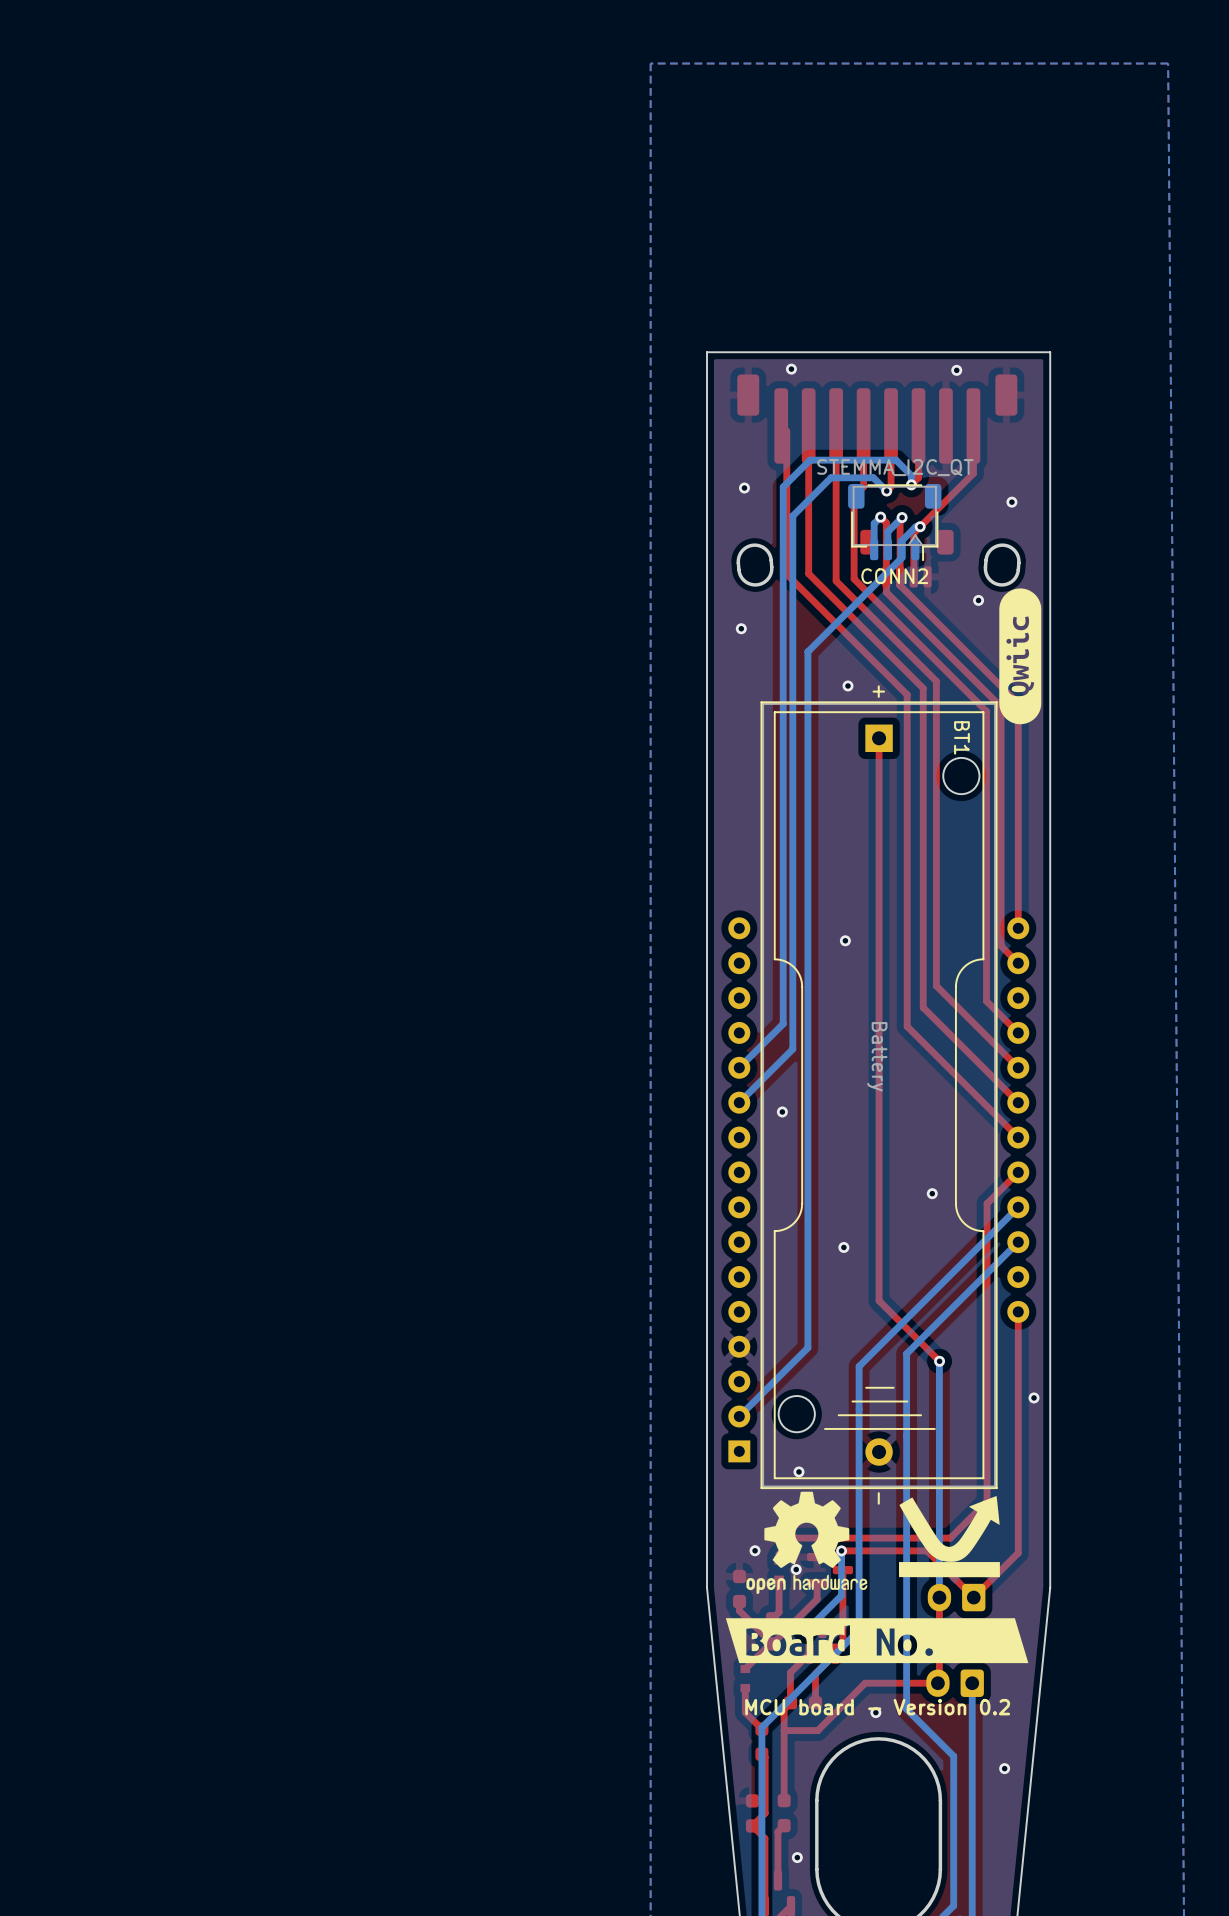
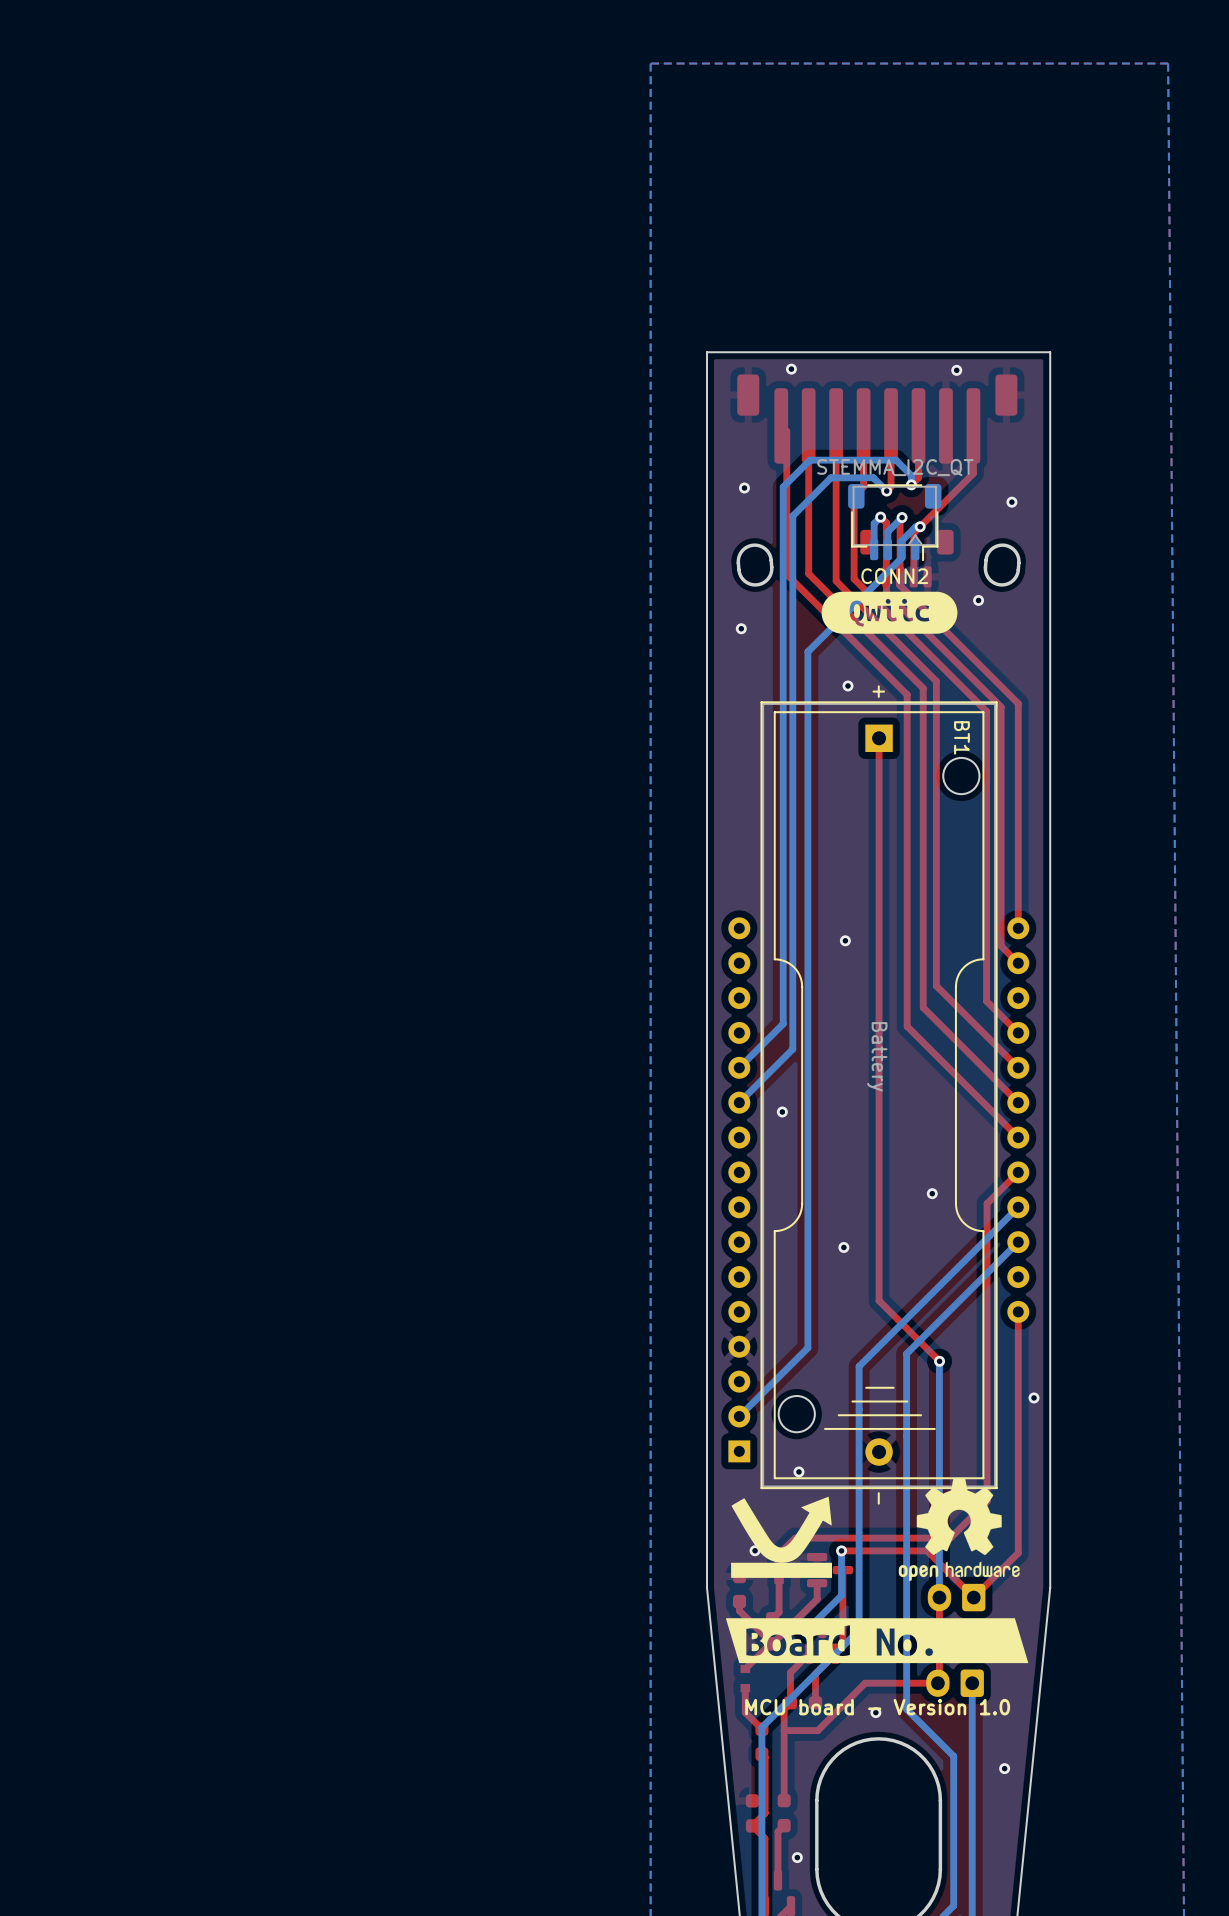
drawing: [999, 588, 1042, 725] -> none
drawing: none -> [821, 591, 958, 634]
drawing position: (949, 1536) -> (781, 1537)
drawing position: (806, 1542) -> (959, 1529)
text: MCU board - Version 0.2 (877, 1707) -> MCU board - Version 1.0 (877, 1707)

